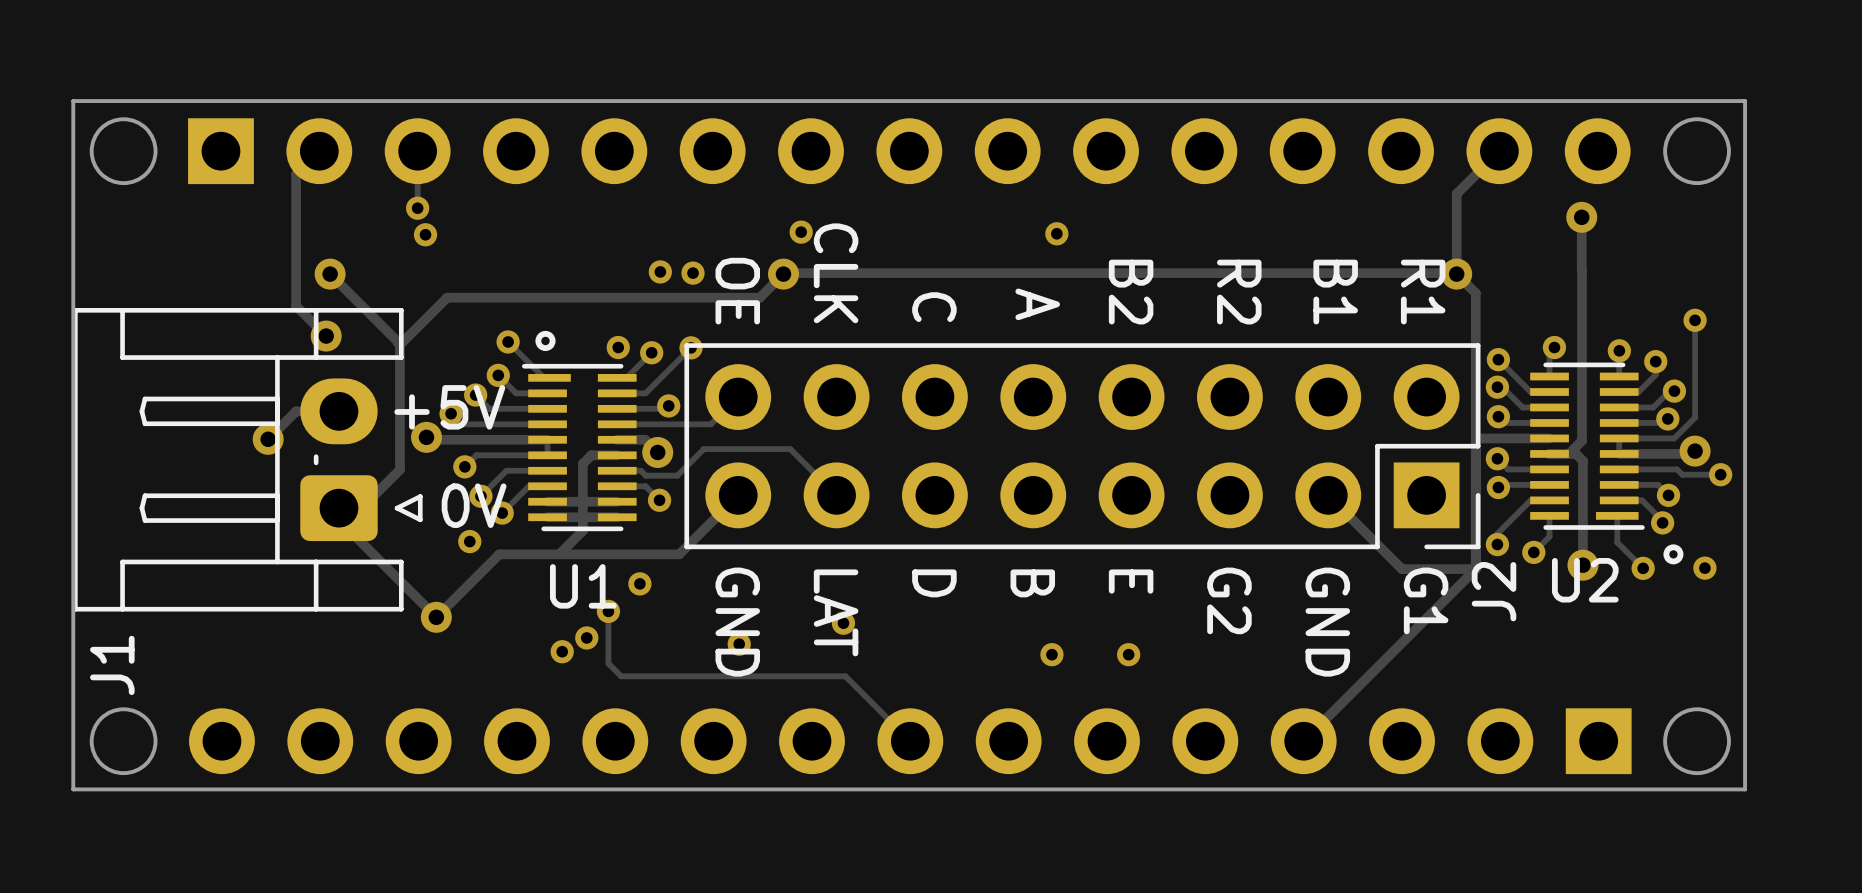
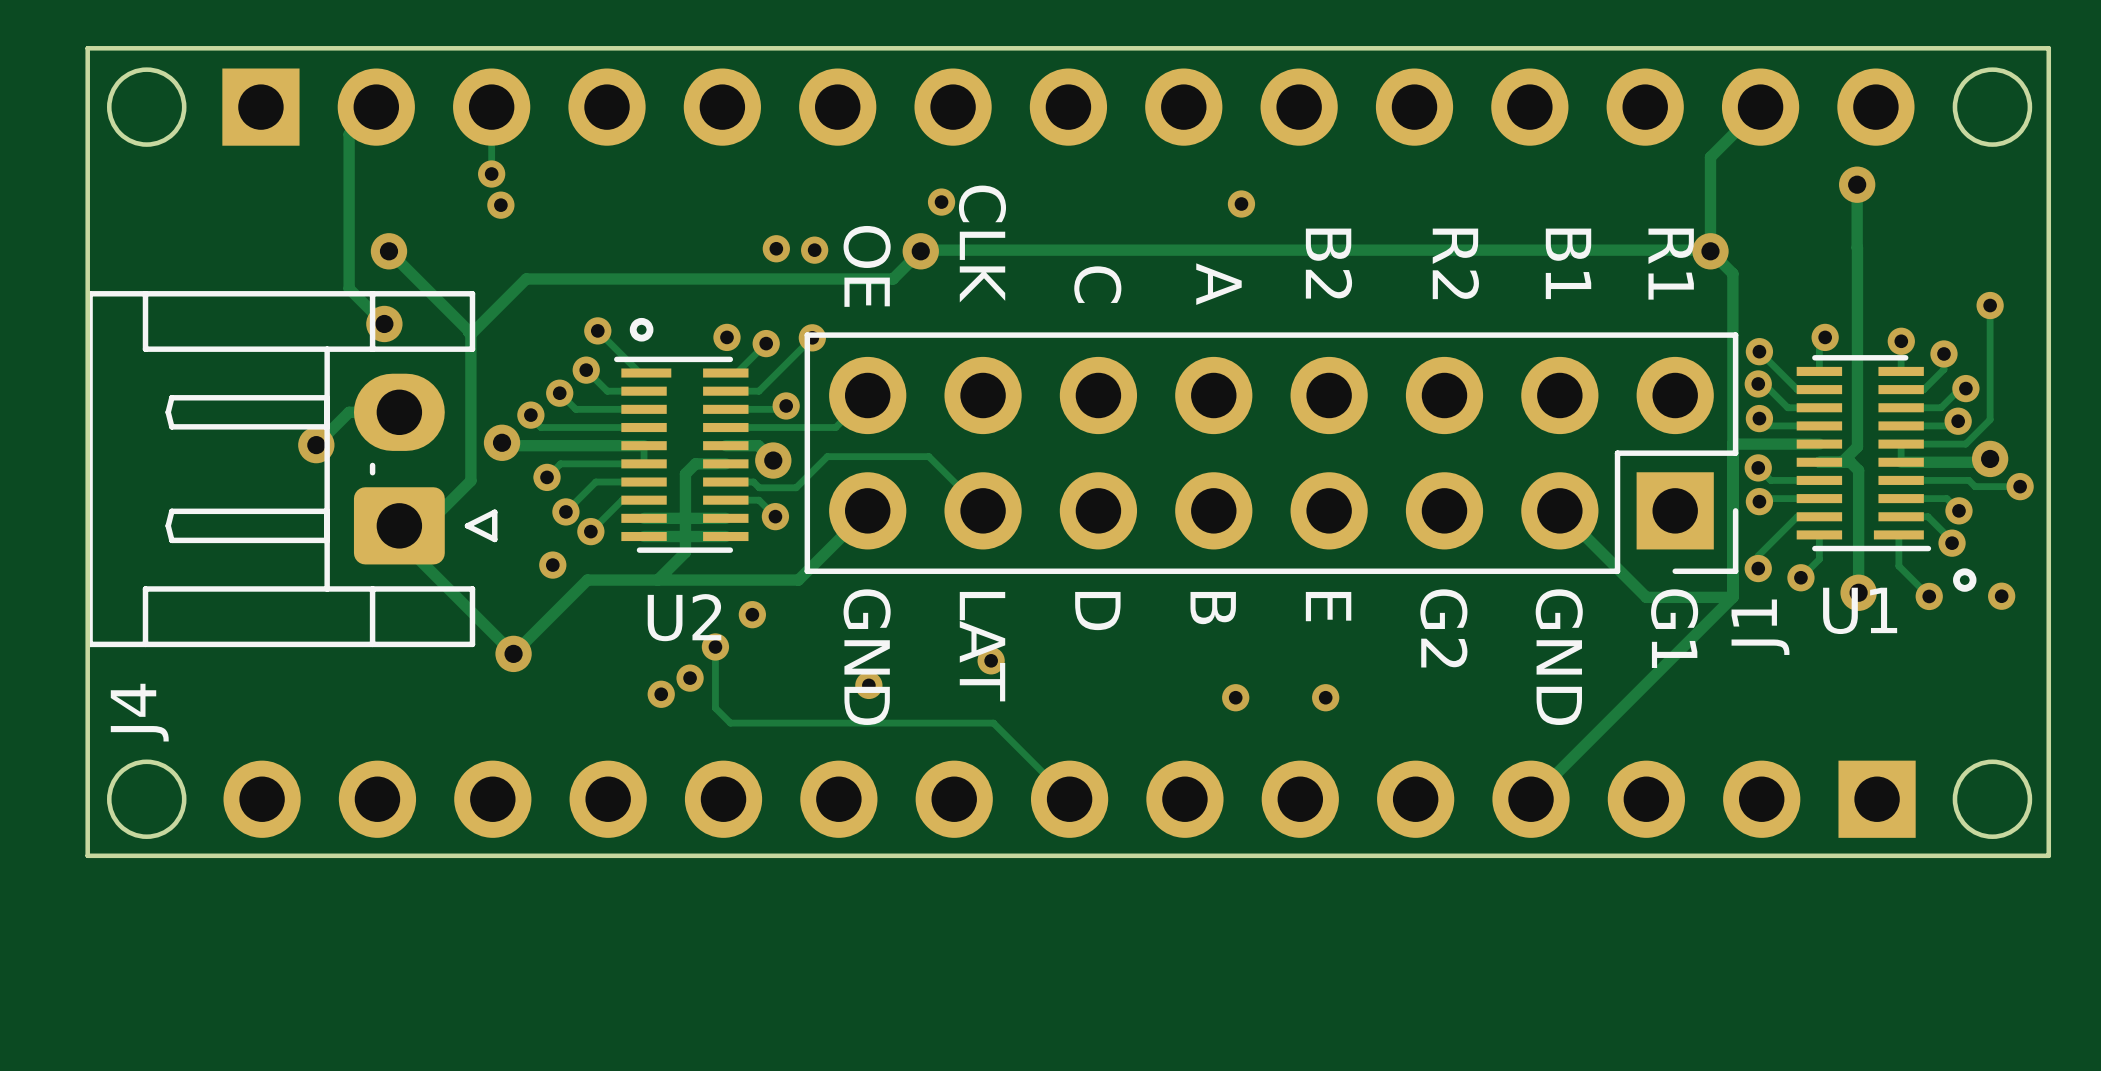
text: +5V (449, 407) -> none
text: 0V (474, 505) -> none
U2 name: U2 (1585, 580) -> U1 (1860, 610)
U1 name: U1 (583, 586) -> U2 (684, 617)
J2 name: J2 (1494, 591) -> J1 (1760, 627)
J1 name: J1 (112, 665) -> J4 (139, 712)

